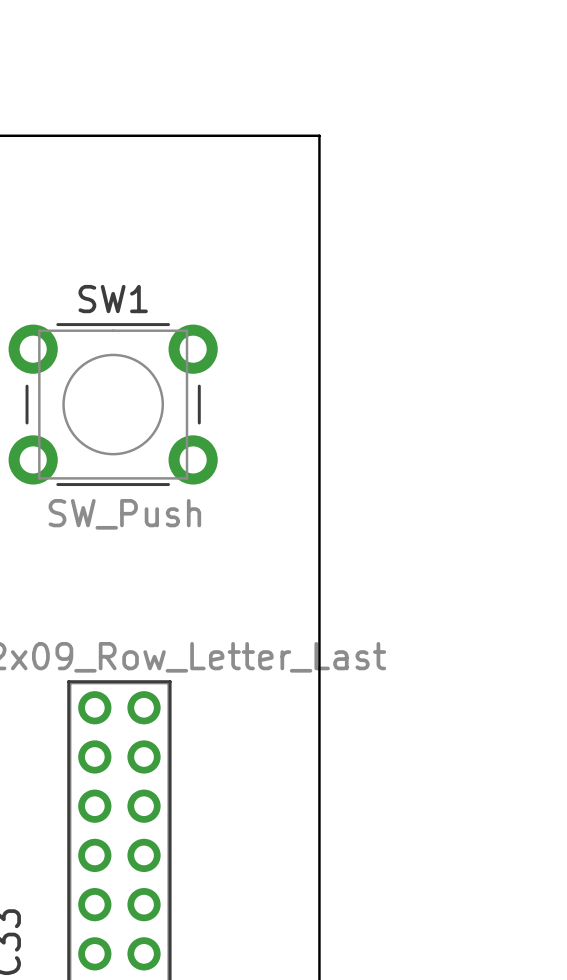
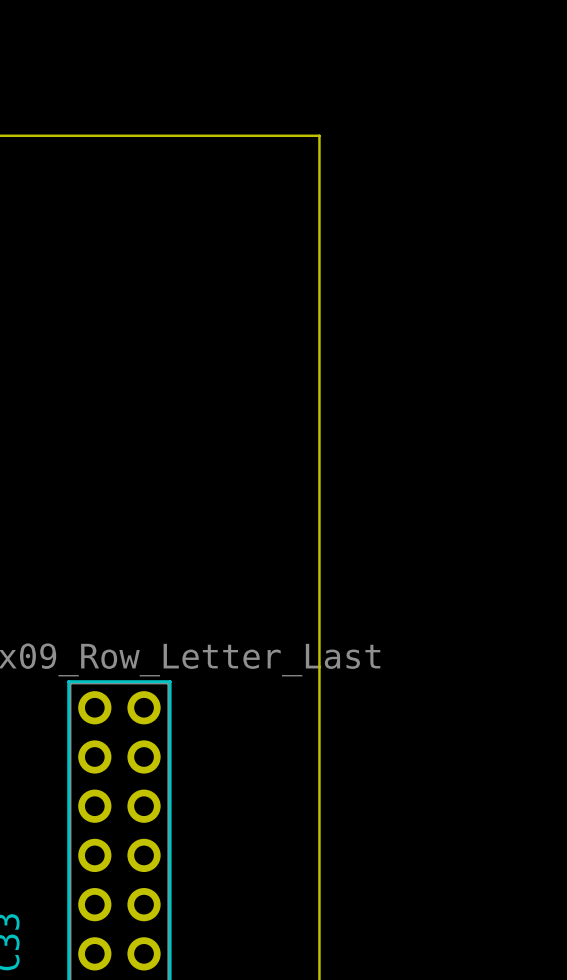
SW1: SW_Push (113, 404) -> none

